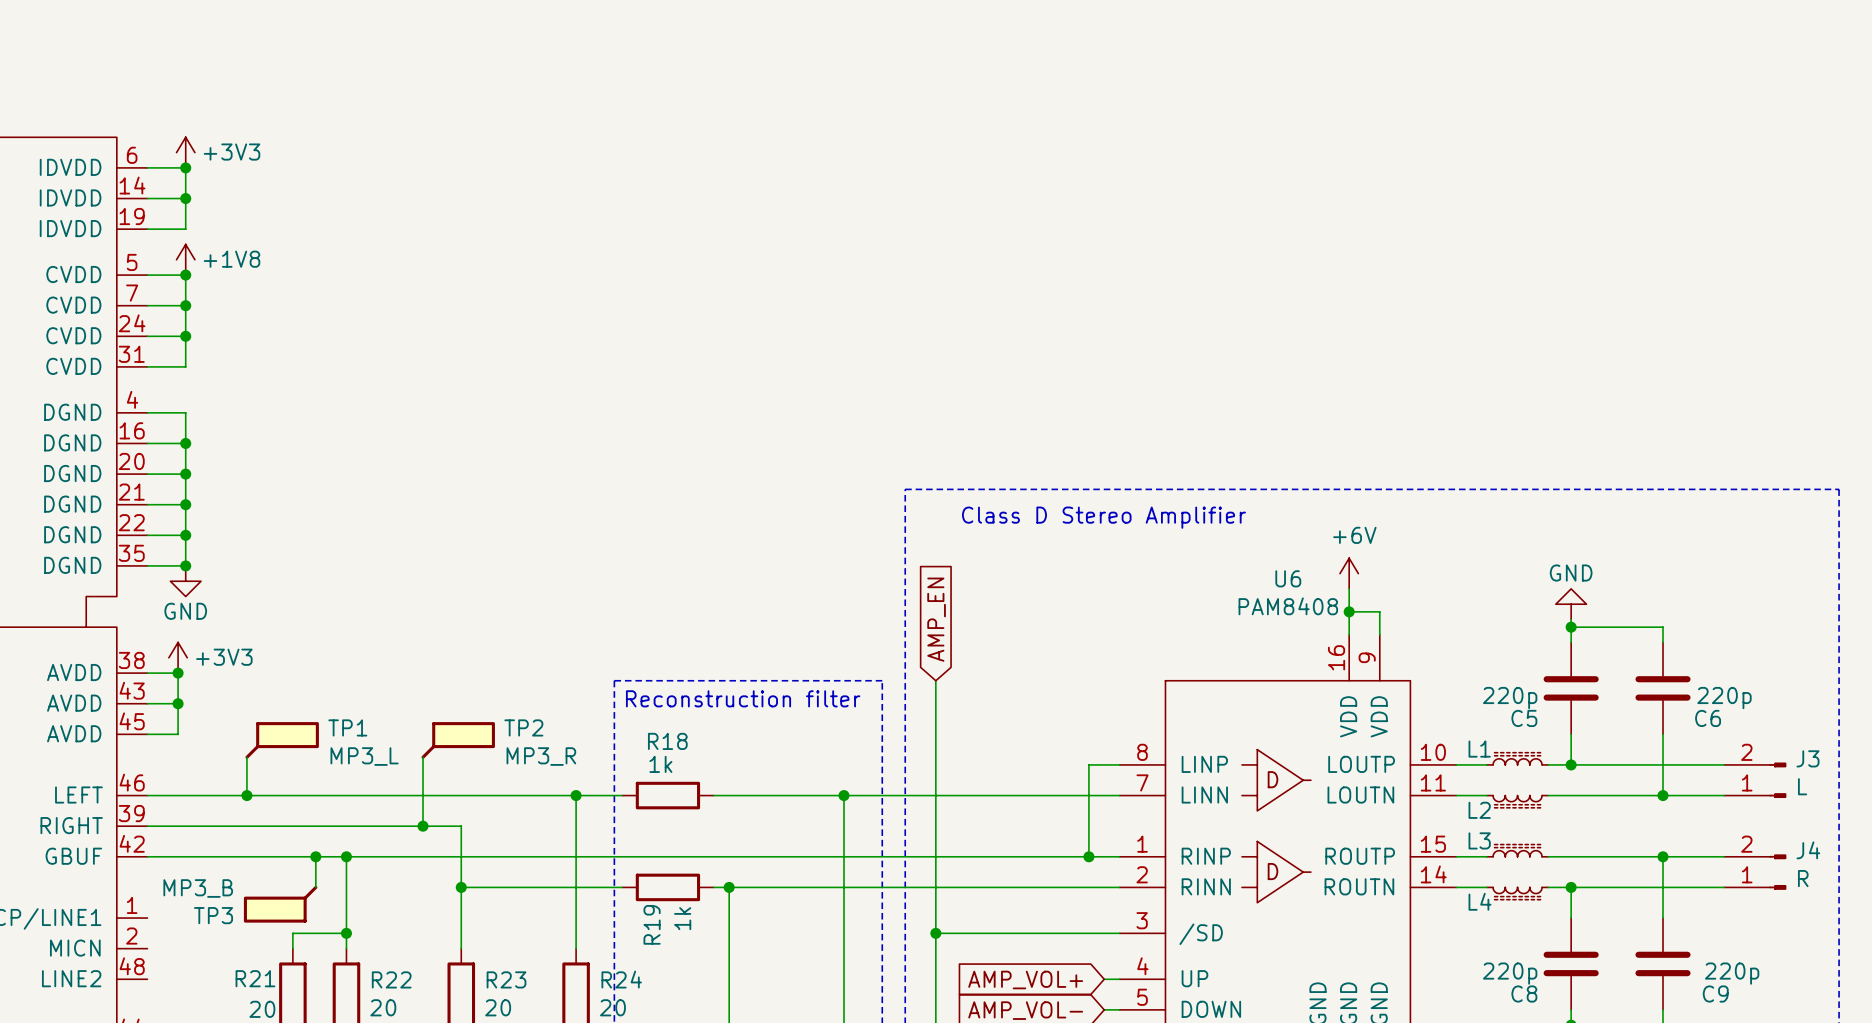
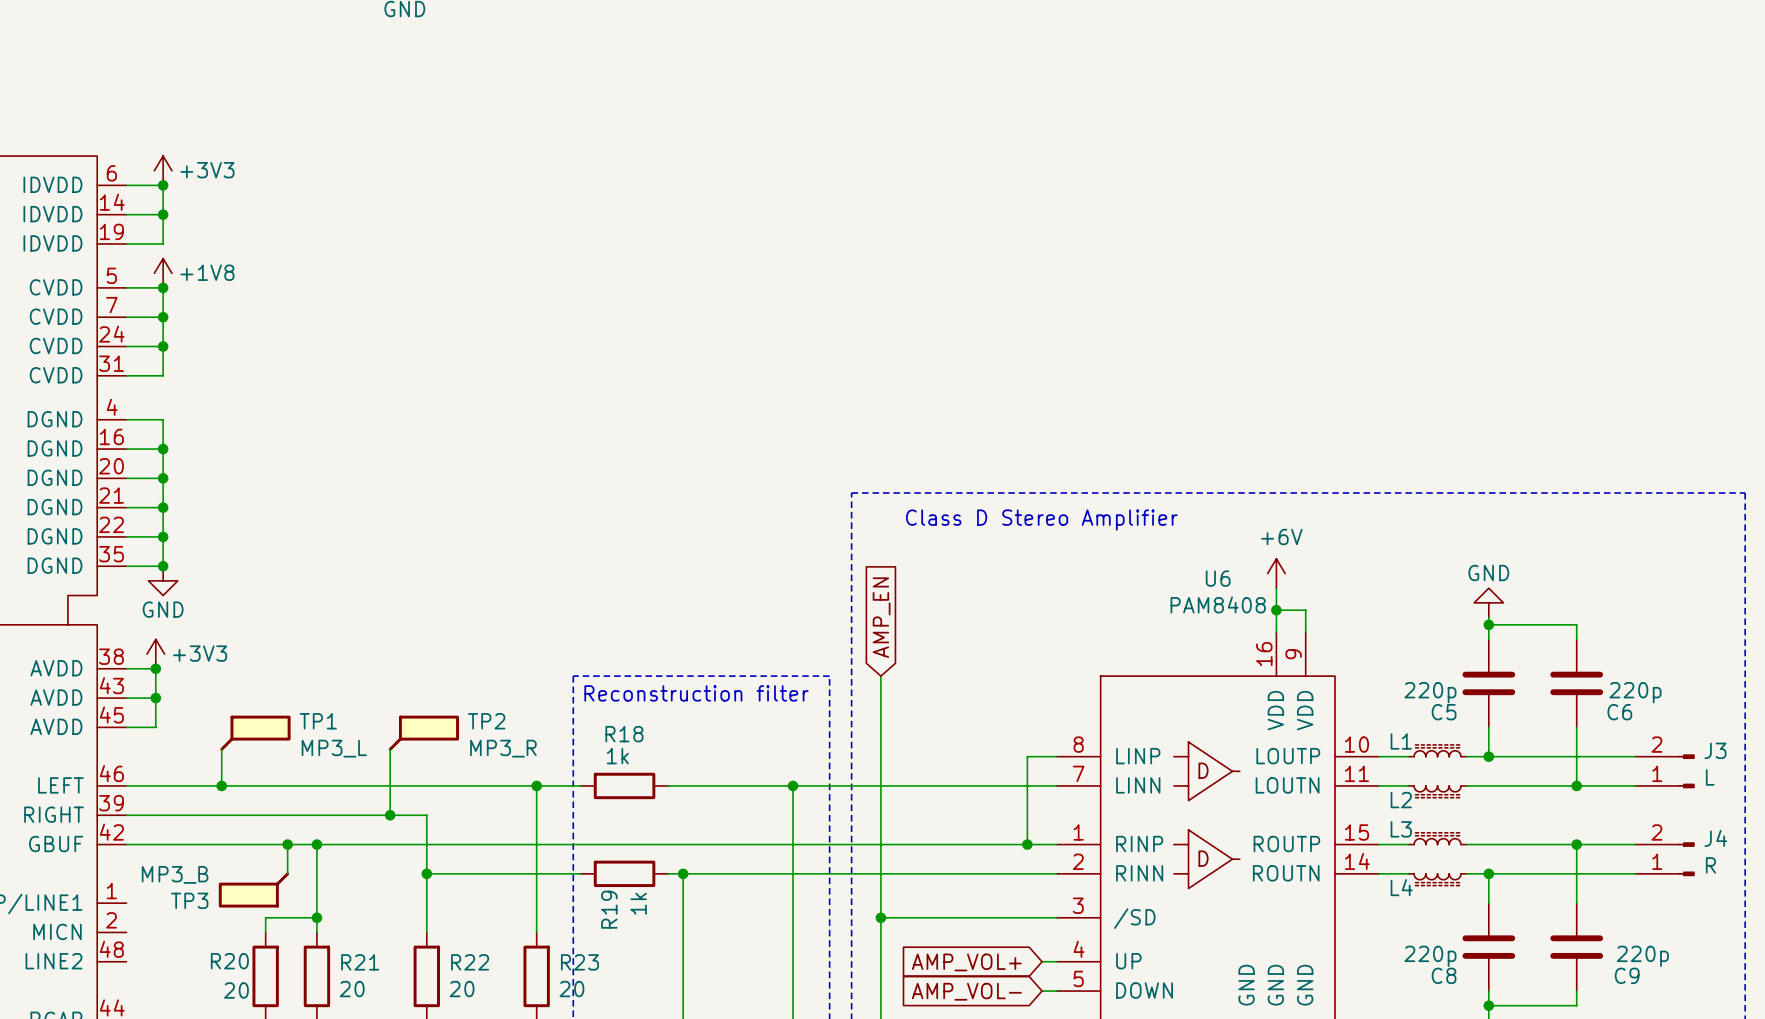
R21 name: R21 (255, 978) -> R20 (229, 961)
R22 name: R22 (391, 979) -> R21 (360, 962)
R23 name: R23 (506, 979) -> R22 (470, 962)
R24 name: R24 (621, 979) -> R23 (579, 962)

